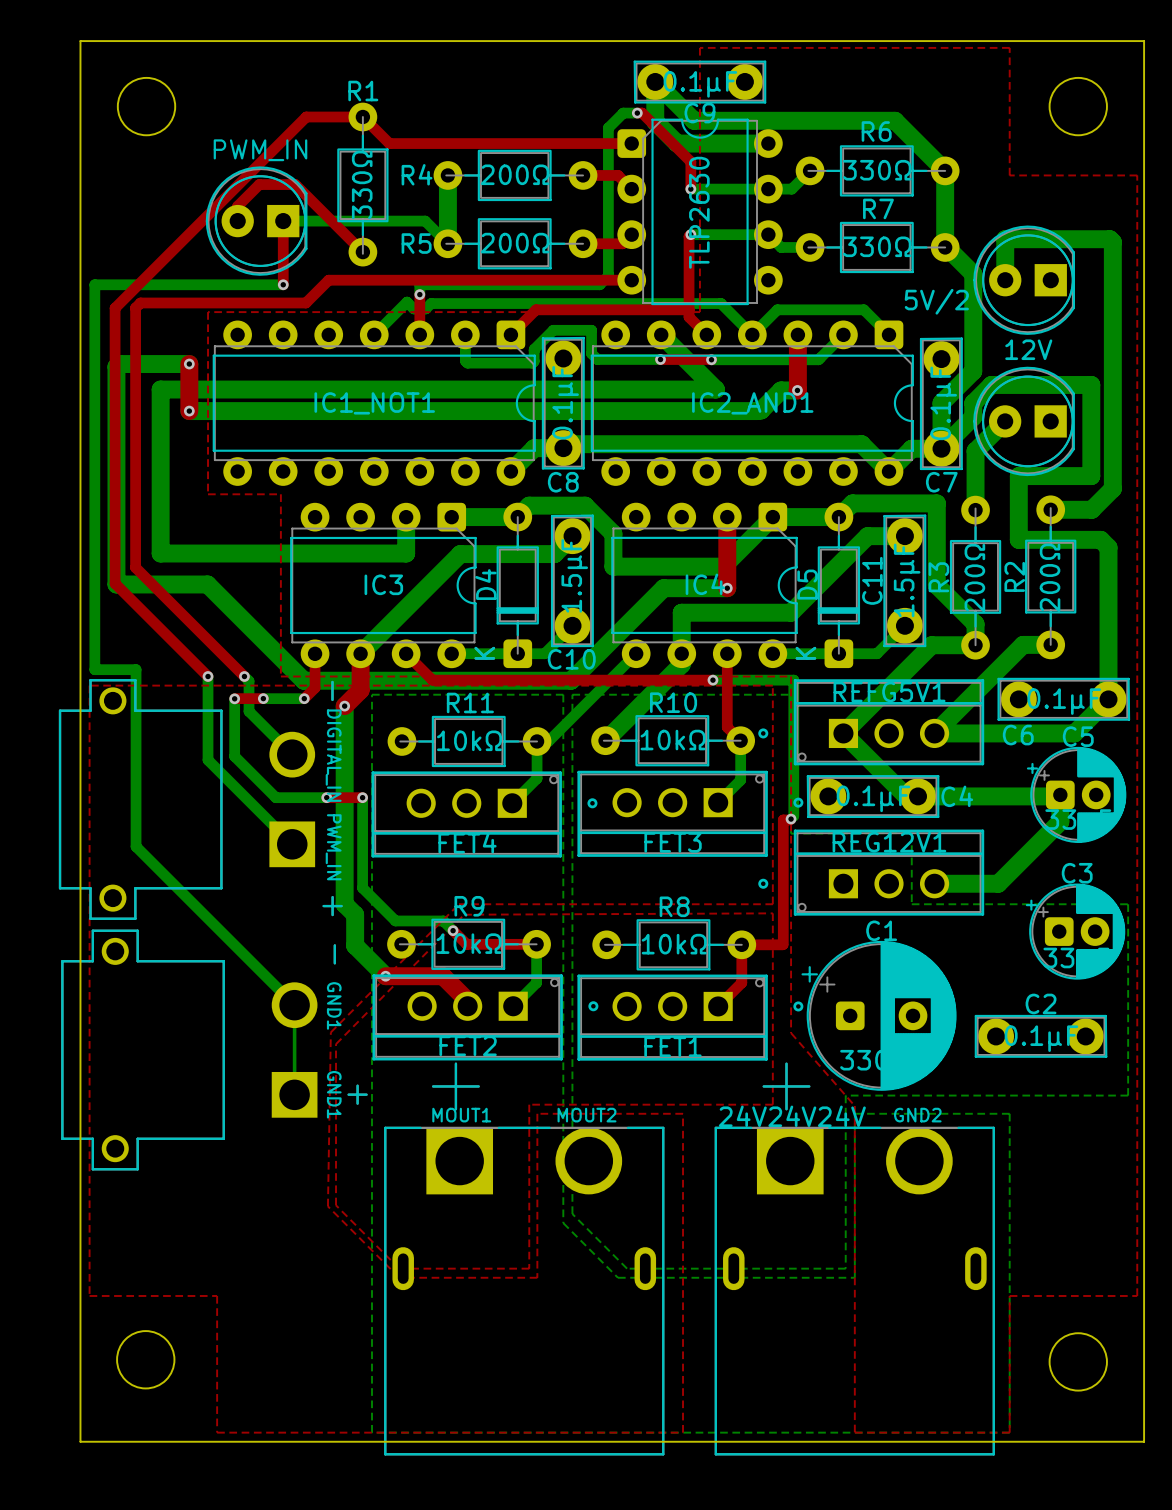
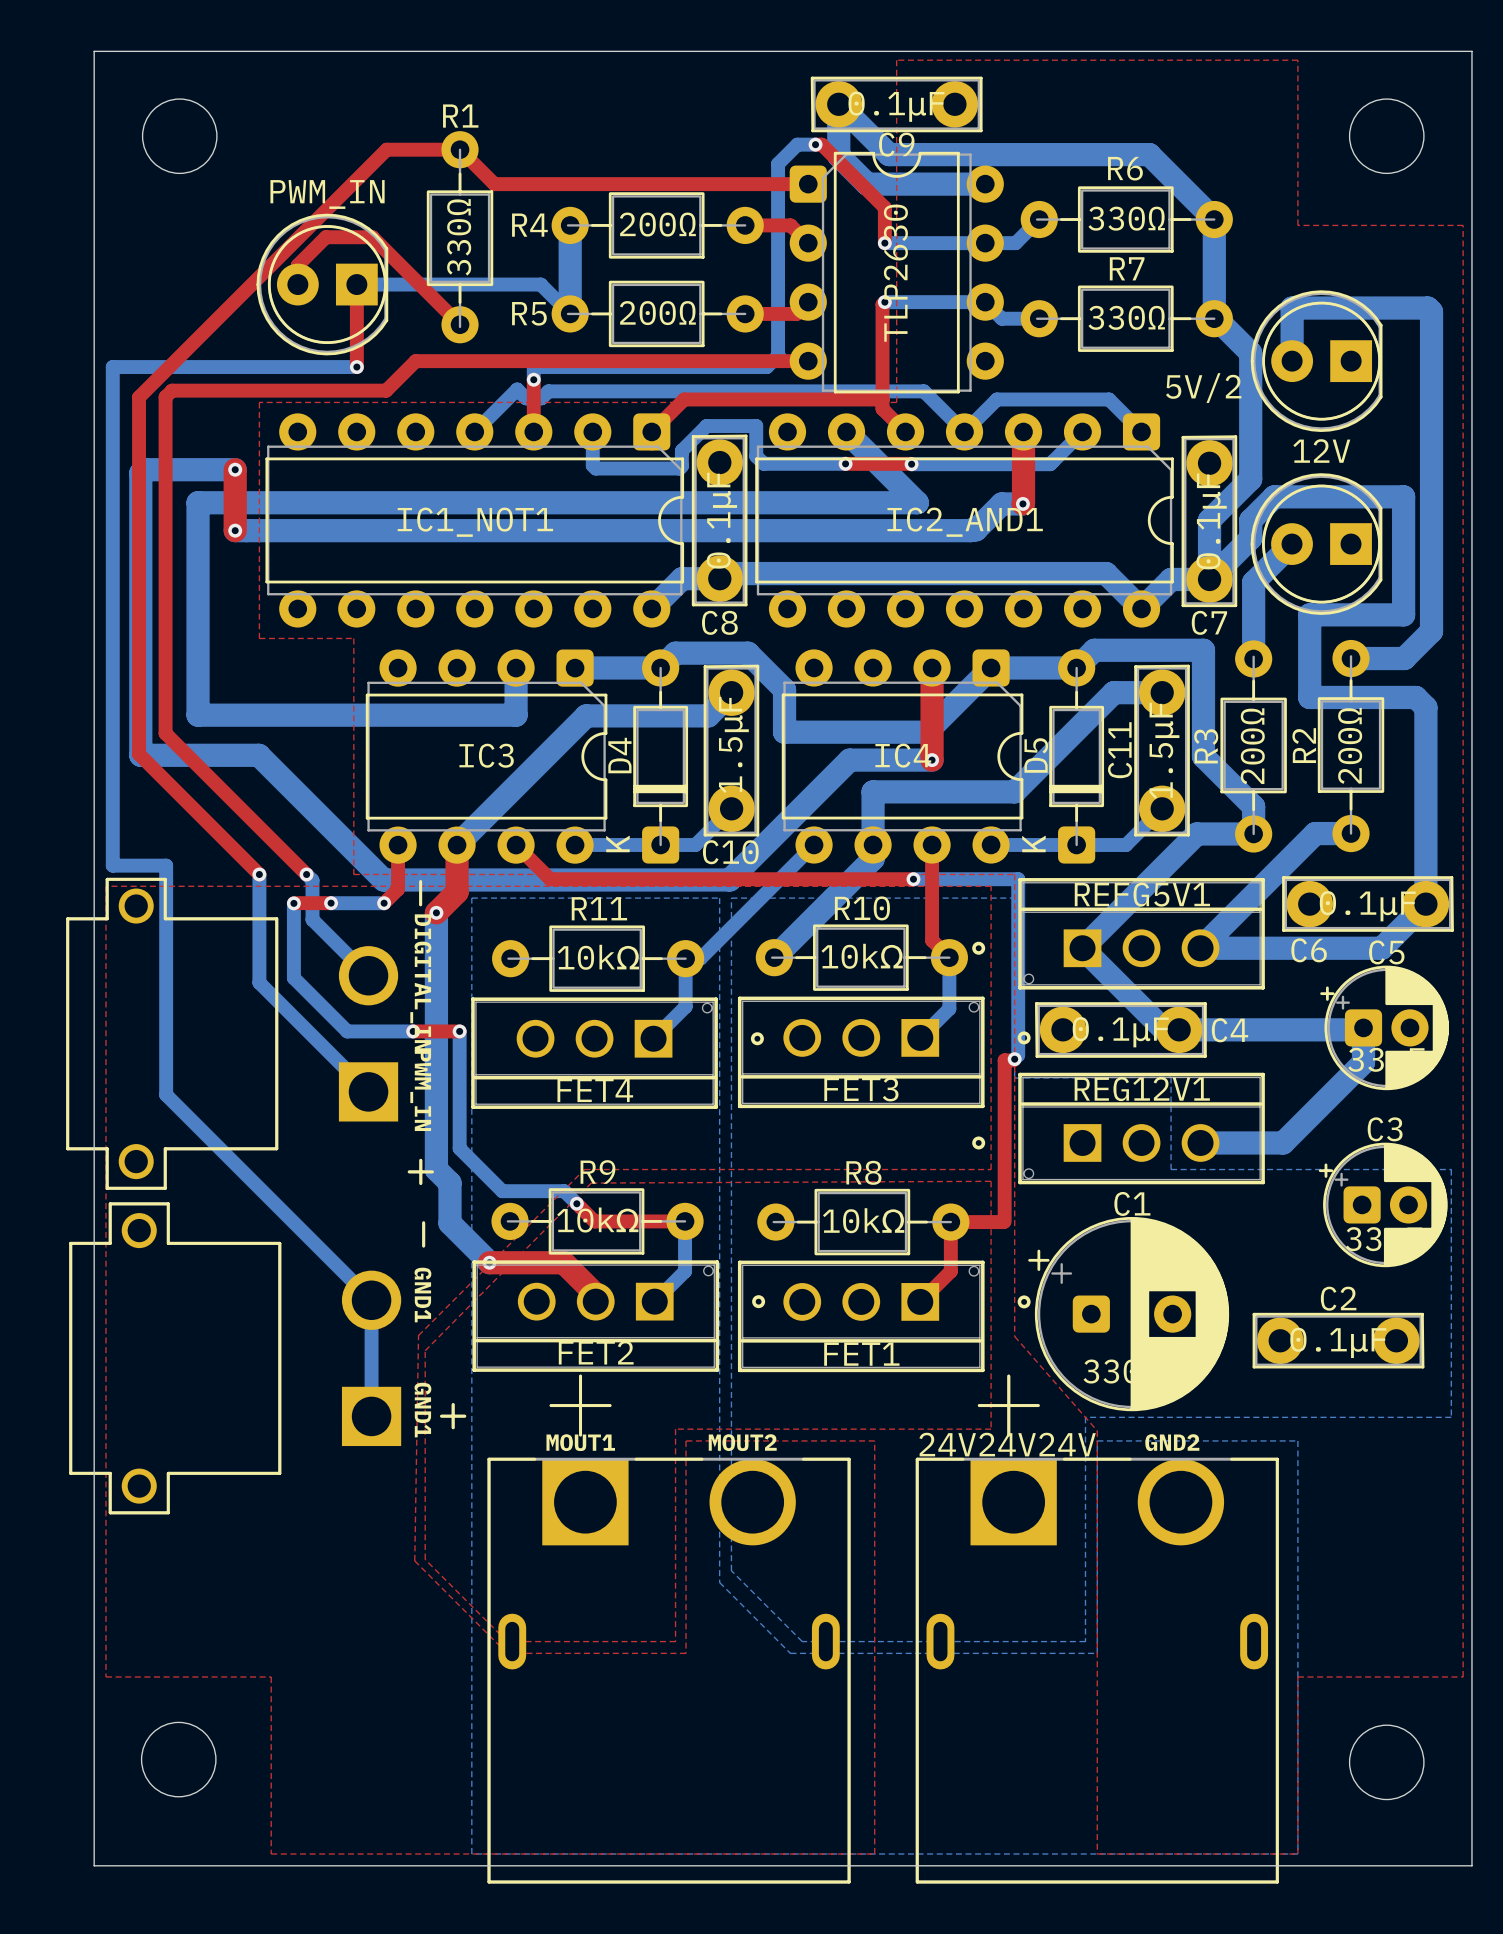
bottom track width: thin (294, 1005) (294, 1094) -> thick (371, 1300) (371, 1416)

